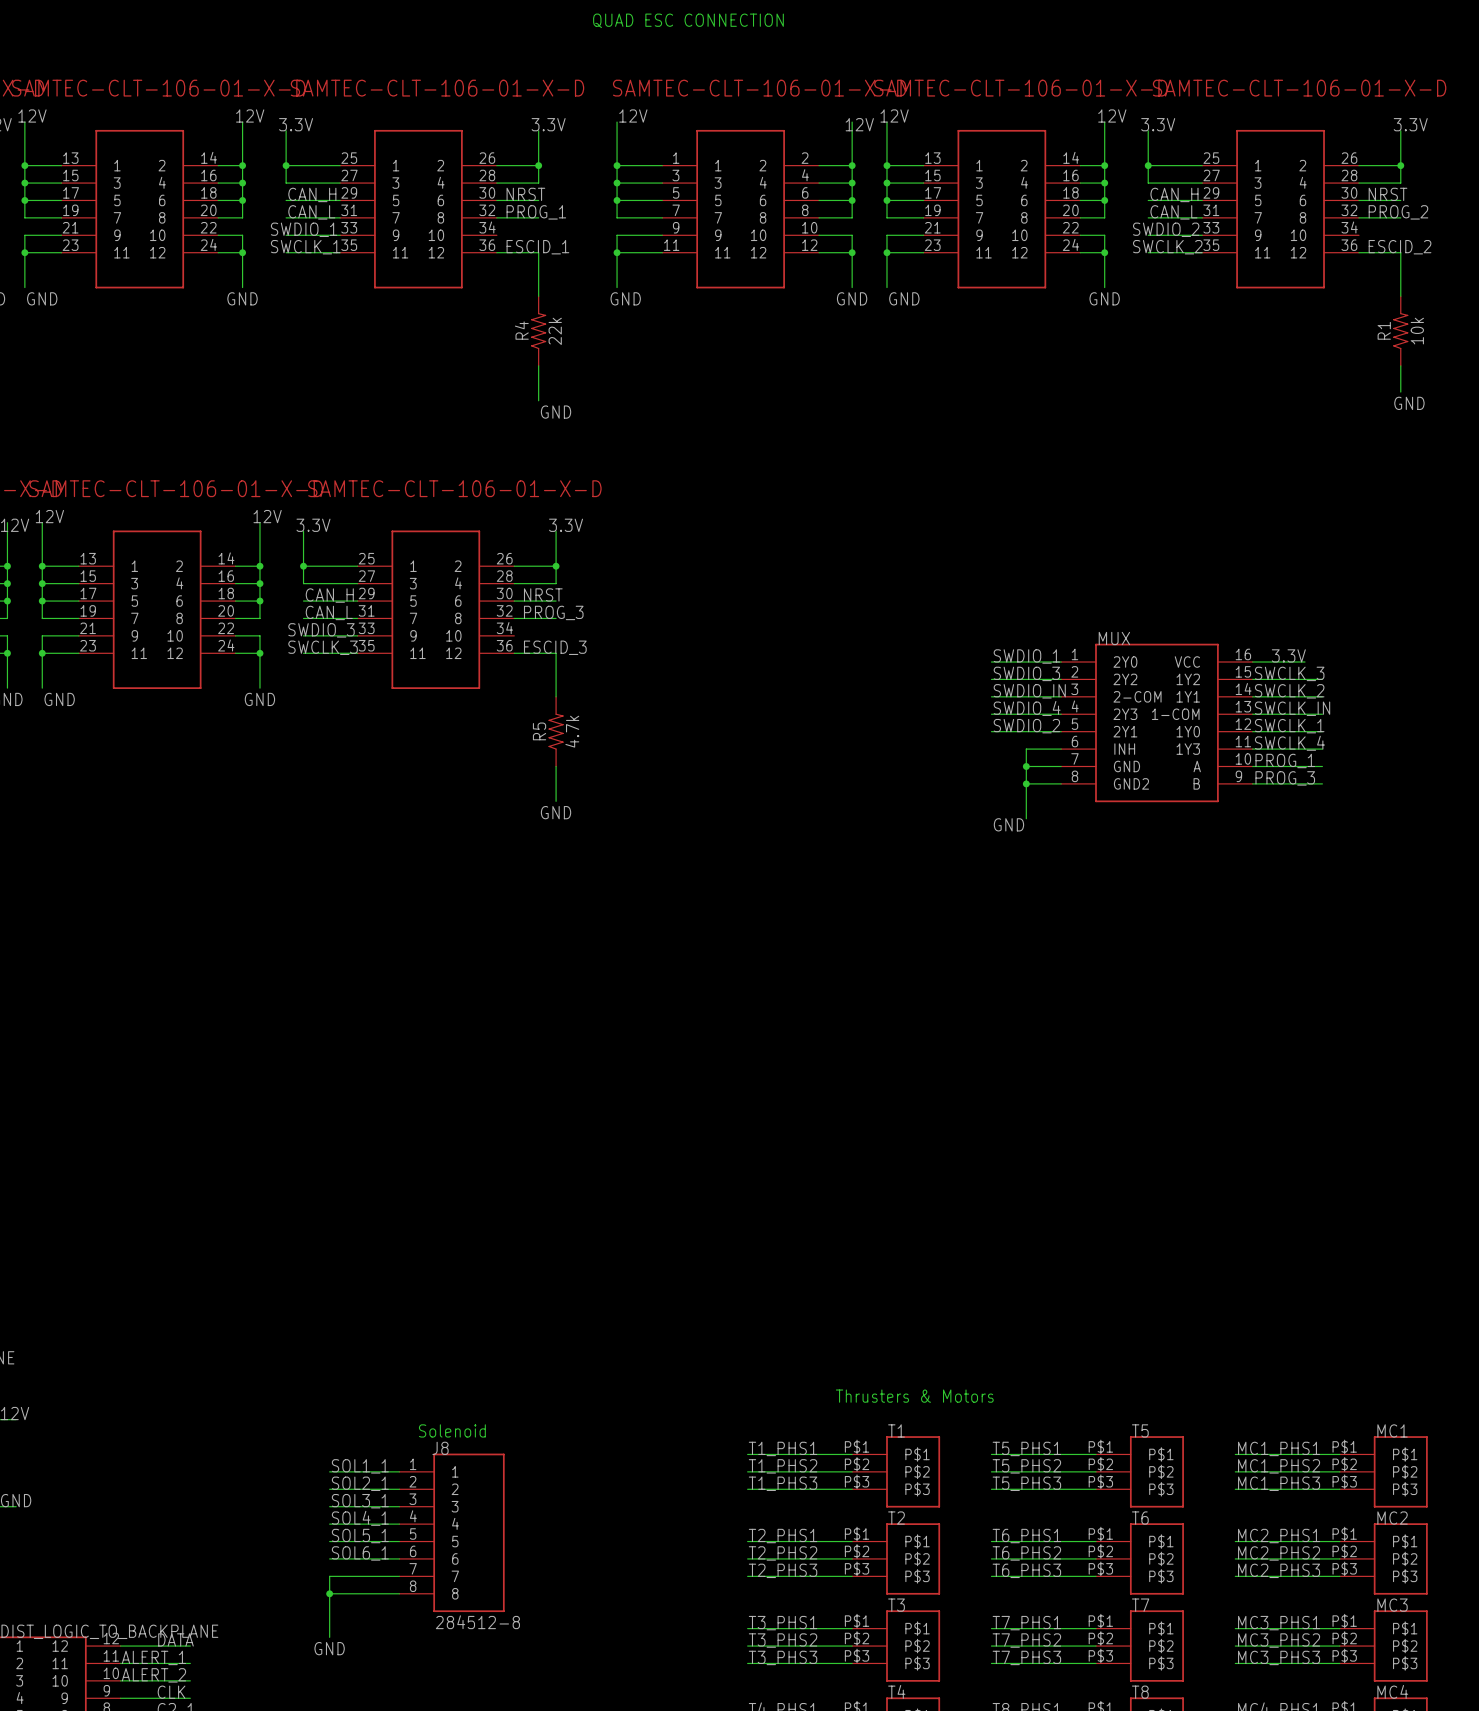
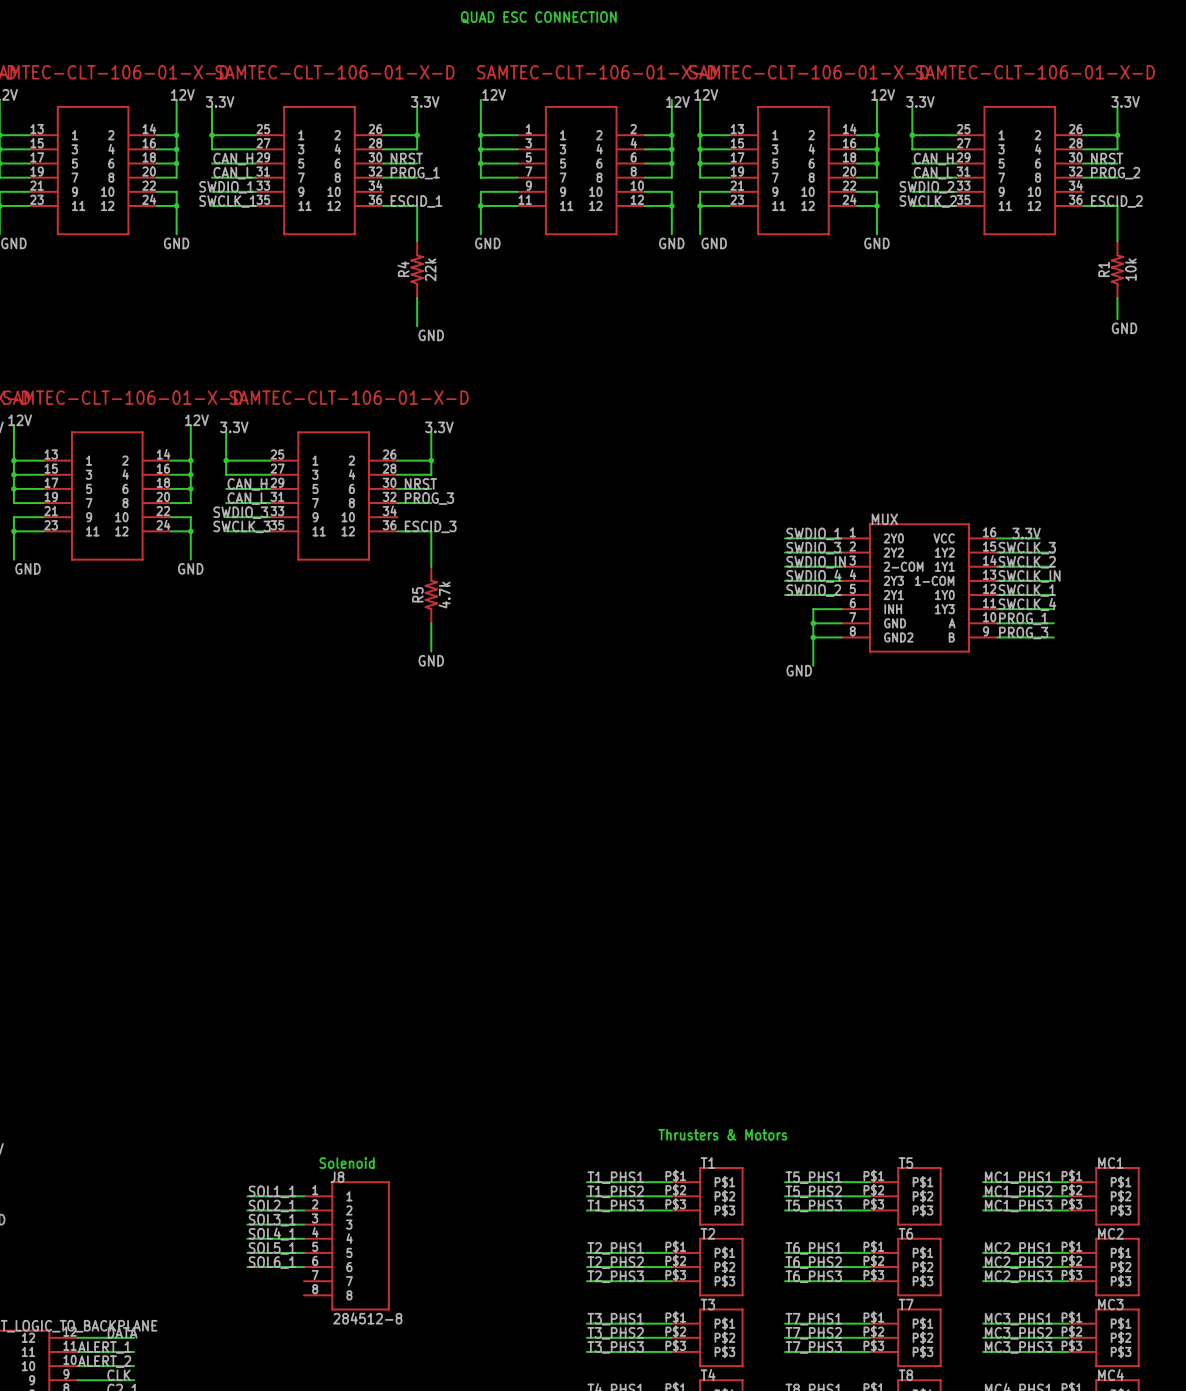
wire: (399, 1576) (329, 1576) (329, 1637) -> none
wire: (329, 1593) (399, 1593) -> none
junction: (329, 1593) -> none
label: GND (329, 1648) -> none

